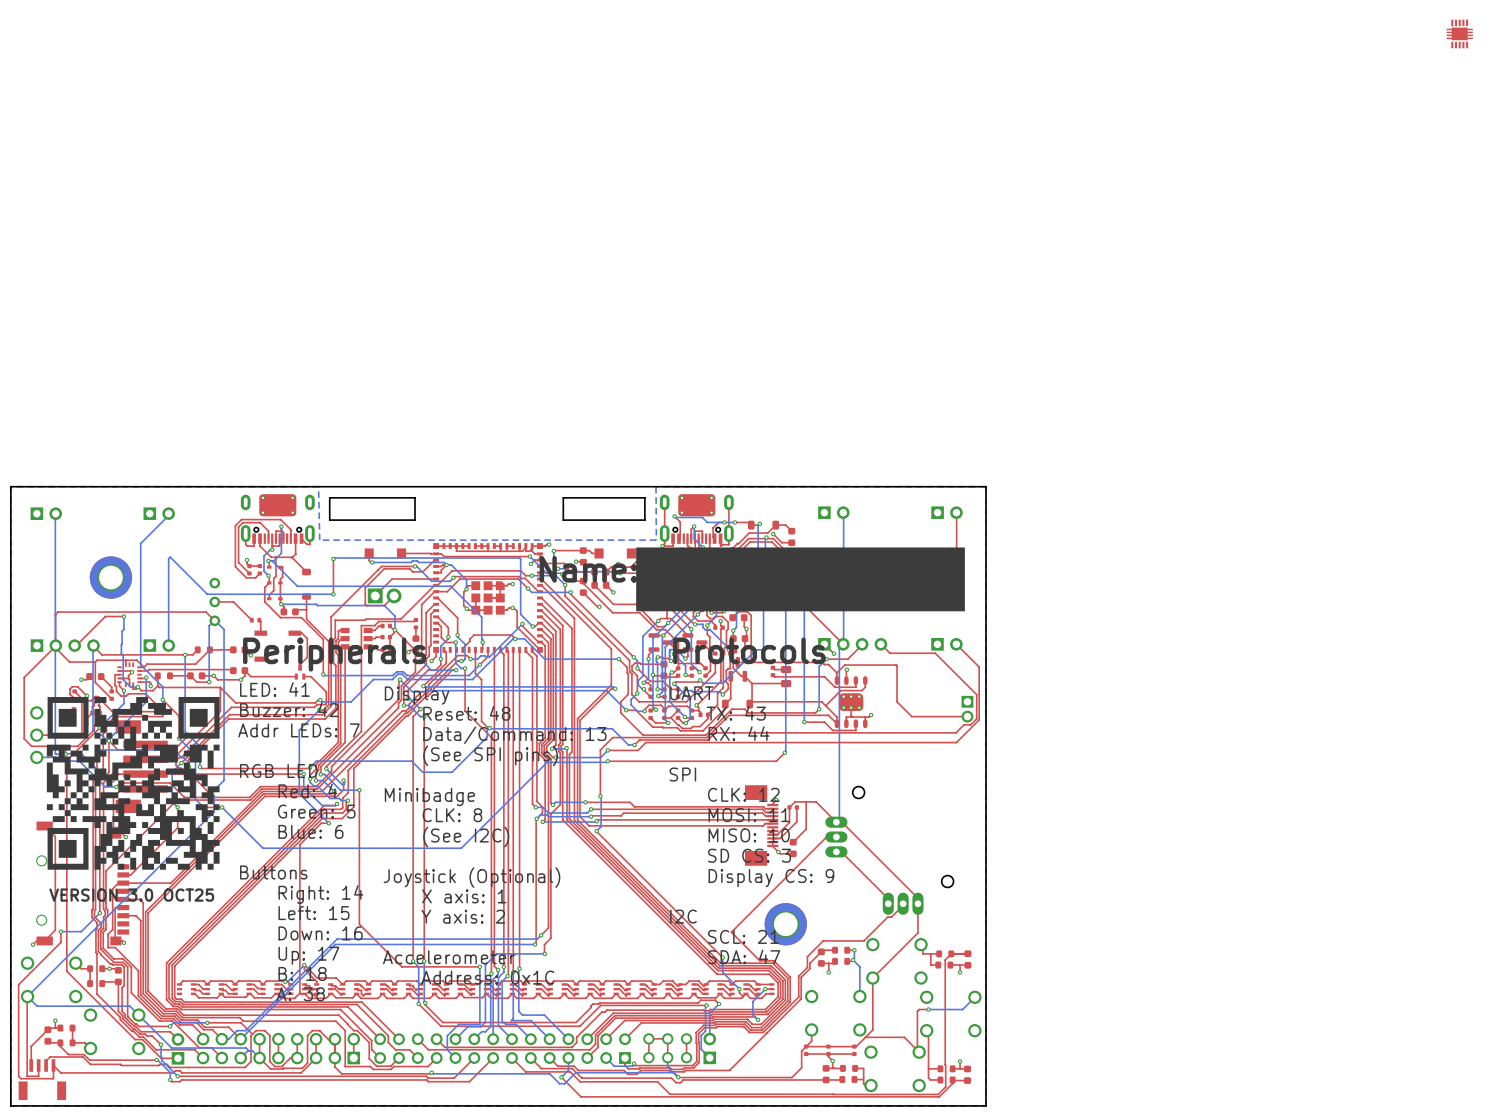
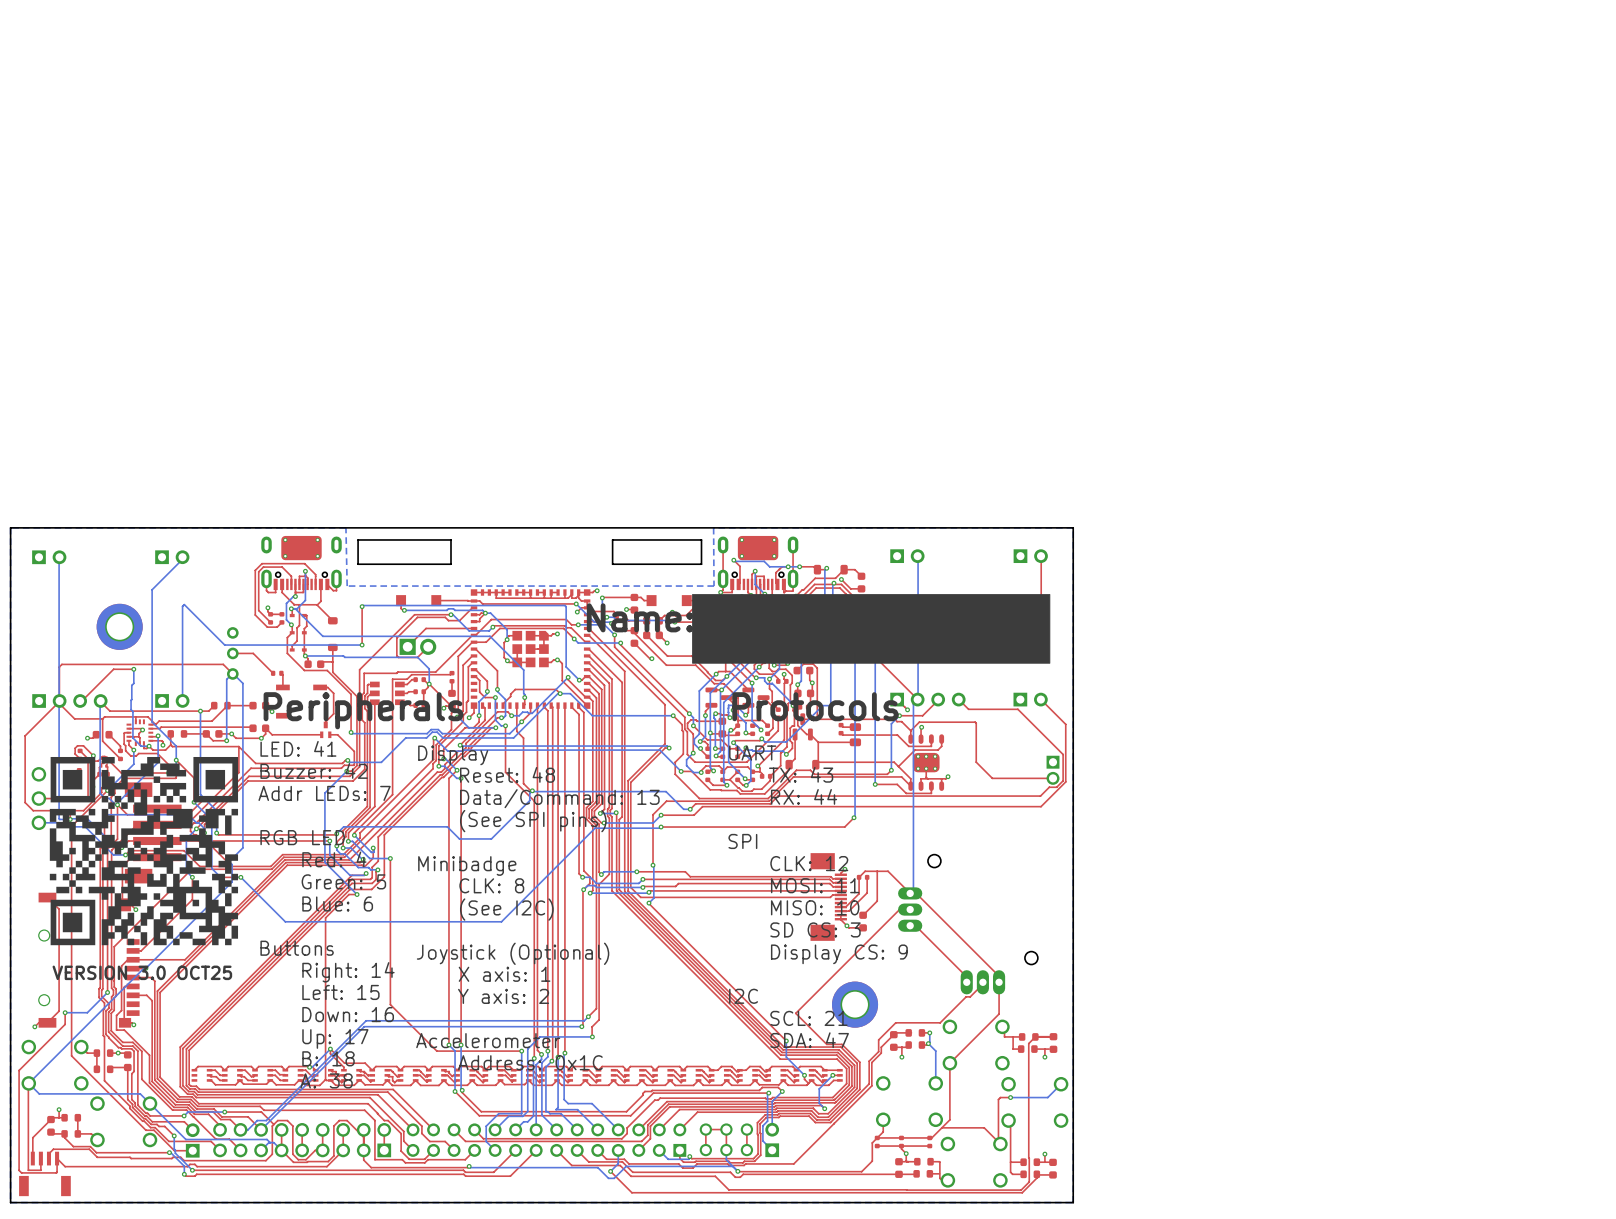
part: (1459, 33) -> none

